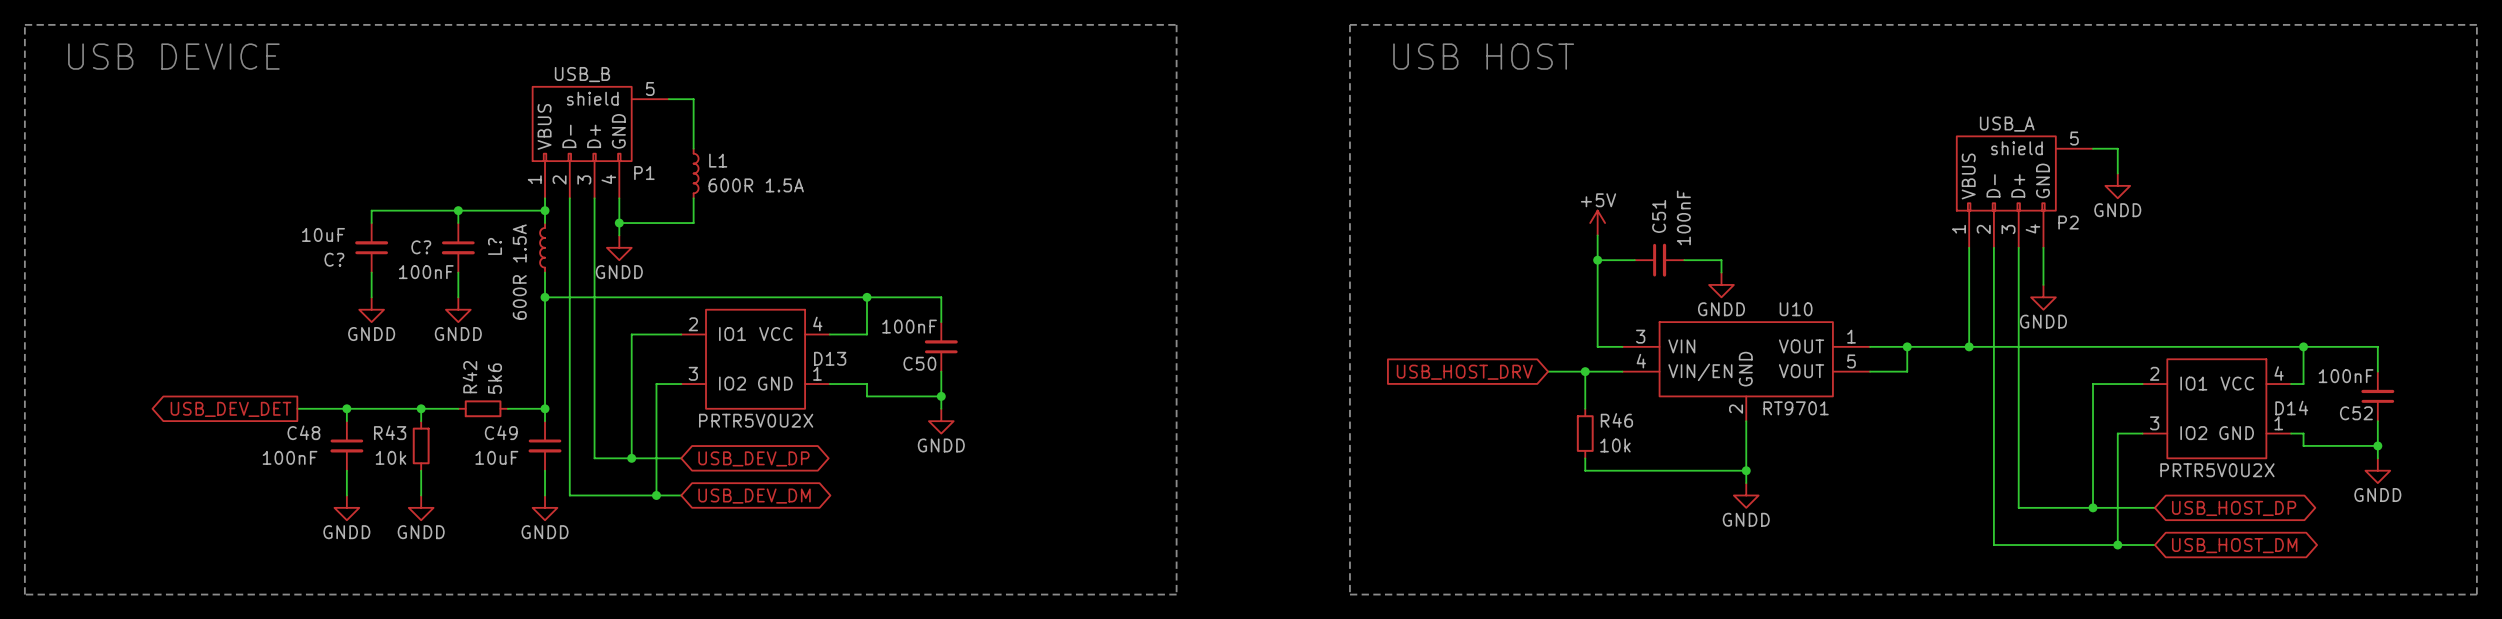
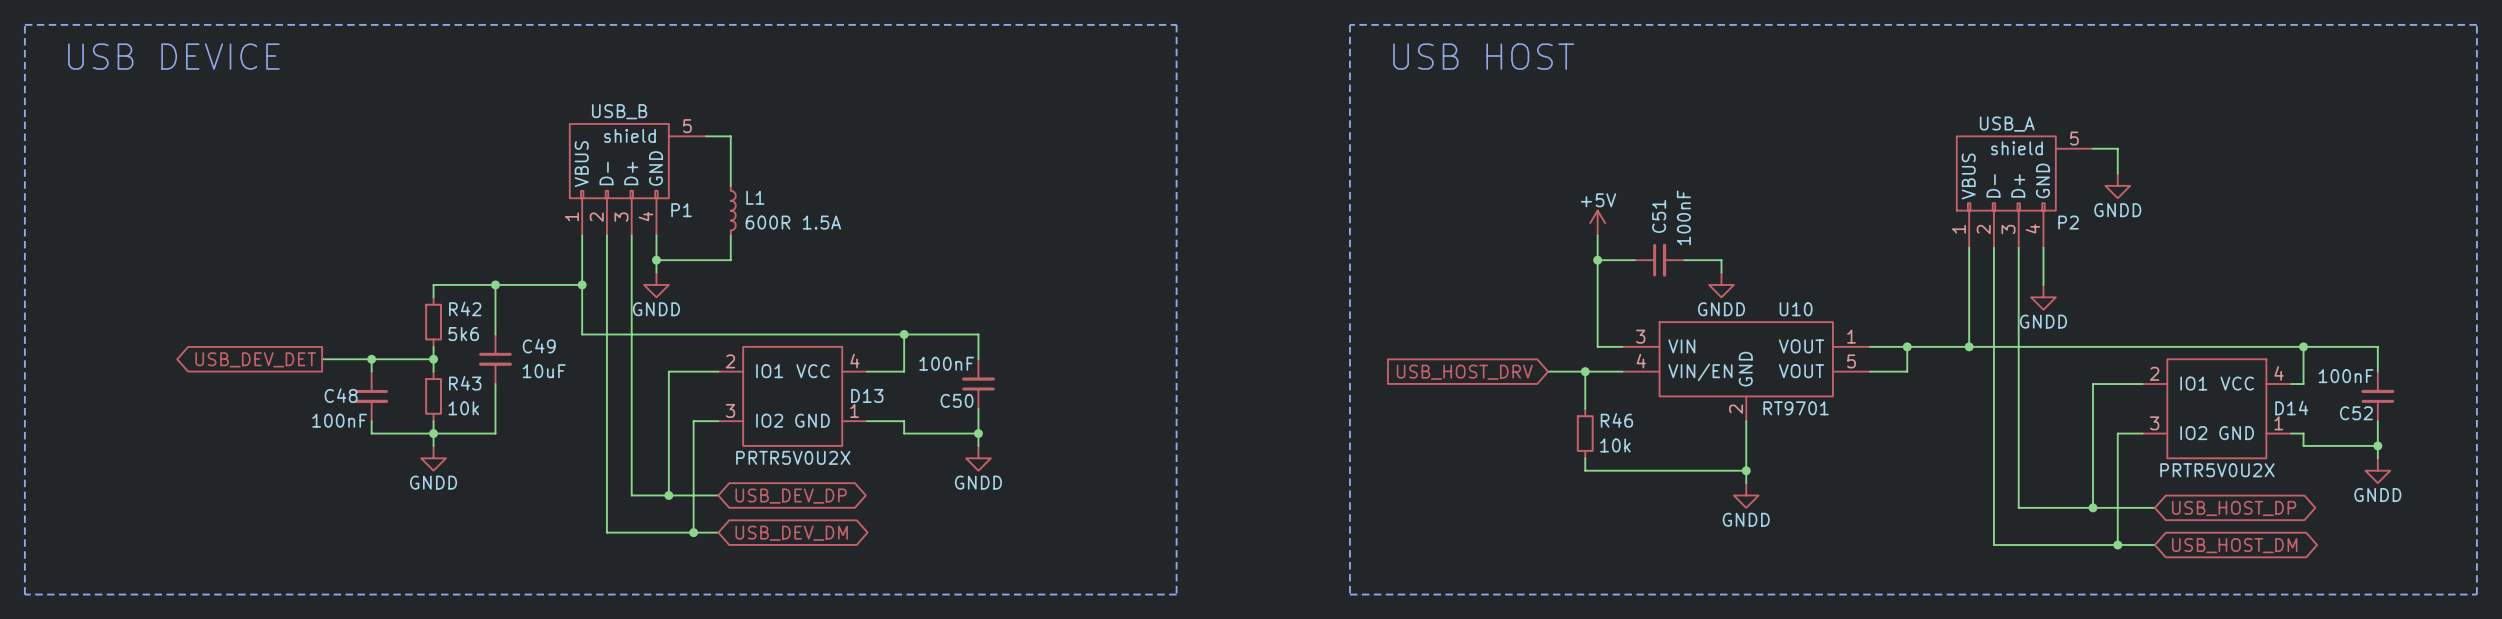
wire: (668, 99) (693, 99) (693, 148) -> (706, 136) (730, 136) (730, 185)
P1 position: (600, 142) -> (637, 179)
L1 position: (696, 173) -> (733, 210)
wire: (545, 198) (545, 223) -> none
wire: (569, 198) (569, 495) (631, 495) -> (631, 458) (631, 495)
wire: (594, 198) (594, 458) (681, 458) -> none
wire: (619, 198) (619, 235) -> (656, 235) (656, 272)
wire: (693, 198) (693, 223) (619, 223) -> (730, 235) (730, 260) (656, 260)
wire: (458, 210) (458, 223) -> none
junction: (458, 210) -> none
wire: (545, 210) (371, 210) (371, 223) -> none
junction: (545, 210) -> none
junction: (619, 223) -> none
wire: none -> (582, 235) (582, 334) (631, 334) (631, 235)
wire: none -> (606, 235) (606, 532) (718, 532)
C?: 10uF (371, 247) -> none
C?: 100nF (458, 247) -> none
L?: 600R 1.5A (542, 247) -> none
power symbol position: GNDD (619, 247) -> GNDD (656, 284)
junction: none -> (656, 260)
wire: (371, 272) (371, 297) -> none
wire: (458, 272) (458, 297) -> (433, 346) (433, 371)
wire: (545, 272) (545, 421) -> none
wire: none -> (495, 284) (495, 334)
junction: none -> (495, 284)
wire: none -> (582, 284) (433, 284) (433, 297)
junction: none -> (582, 284)
wire: (545, 297) (941, 297) (941, 322) -> none
junction: (545, 297) -> none
wire: (867, 297) (867, 334) -> (978, 359) (978, 334) (867, 334)
junction: (867, 297) -> none
power symbol: GNDD (371, 309) -> none
power symbol: GNDD (458, 309) -> none
wire: none -> (681, 334) (829, 334)
wire: none -> (904, 334) (904, 371) (867, 371)
junction: none -> (904, 334)
C50 position: (941, 346) -> (978, 384)
wire: none -> (322, 359) (433, 359)
junction: none -> (371, 359)
junction: none -> (433, 359)
D13 position: (755, 359) -> (792, 396)
wire: none -> (718, 371) (668, 371) (668, 495)
wire: (941, 371) (941, 408) -> (978, 408) (978, 445)
wire: none -> (495, 384) (495, 433) (371, 433) (371, 421)
wire: (681, 384) (656, 384) (656, 495) -> (718, 421) (693, 421) (693, 532)
wire: (829, 384) (867, 384) (867, 396) (941, 396) -> (867, 421) (904, 421) (904, 433) (978, 433)
junction: (941, 396) -> none
wire: (297, 408) (458, 408) -> none
wire: (346, 408) (346, 421) -> (371, 359) (371, 371)
junction: (346, 408) -> none
wire: (421, 408) (421, 421) -> none
junction: (421, 408) -> none
R42 rotation: 0° (483, 408) -> 90° clockwise (433, 322)
R42 position: (483, 408) -> (433, 322)
wire: (507, 408) (545, 408) -> (681, 495) (718, 495)
junction: (545, 408) -> none
global label position: USB_DEV_DET (230, 409) -> USB_DEV_DET (255, 359)
power symbol position: GNDD (941, 421) -> GNDD (978, 458)
C48 name position: C48 (303, 432) -> C48 (341, 395)
R43 name position: R43 (390, 432) -> R43 (465, 383)
C49 name position: C49 (501, 432) -> C49 (539, 346)
junction: none -> (433, 433)
junction: none -> (978, 433)
C48 position: (346, 445) -> (371, 396)
R43 position: (421, 445) -> (433, 396)
C49 position: (545, 445) -> (495, 359)
C48 value position: 100nF (290, 457) -> 100nF (339, 420)
R43 value position: 10k (391, 457) -> 10k (463, 408)
C49 value position: 10uF (496, 457) -> 10uF (544, 371)
power symbol: none -> GNDD (433, 458)
junction: (631, 458) -> none
global label position: USB_DEV_DP (753, 458) -> USB_DEV_DP (791, 496)
wire: (346, 470) (346, 495) -> none
wire: (421, 470) (421, 495) -> (433, 421) (433, 445)
wire: (545, 470) (545, 495) -> none
junction position: (656, 495) -> (668, 495)
global label position: USB_DEV_DM (754, 496) -> USB_DEV_DM (791, 533)
power symbol: GNDD (346, 507) -> none
power symbol: GNDD (421, 507) -> none
power symbol: GNDD (545, 507) -> none
junction: none -> (693, 532)

